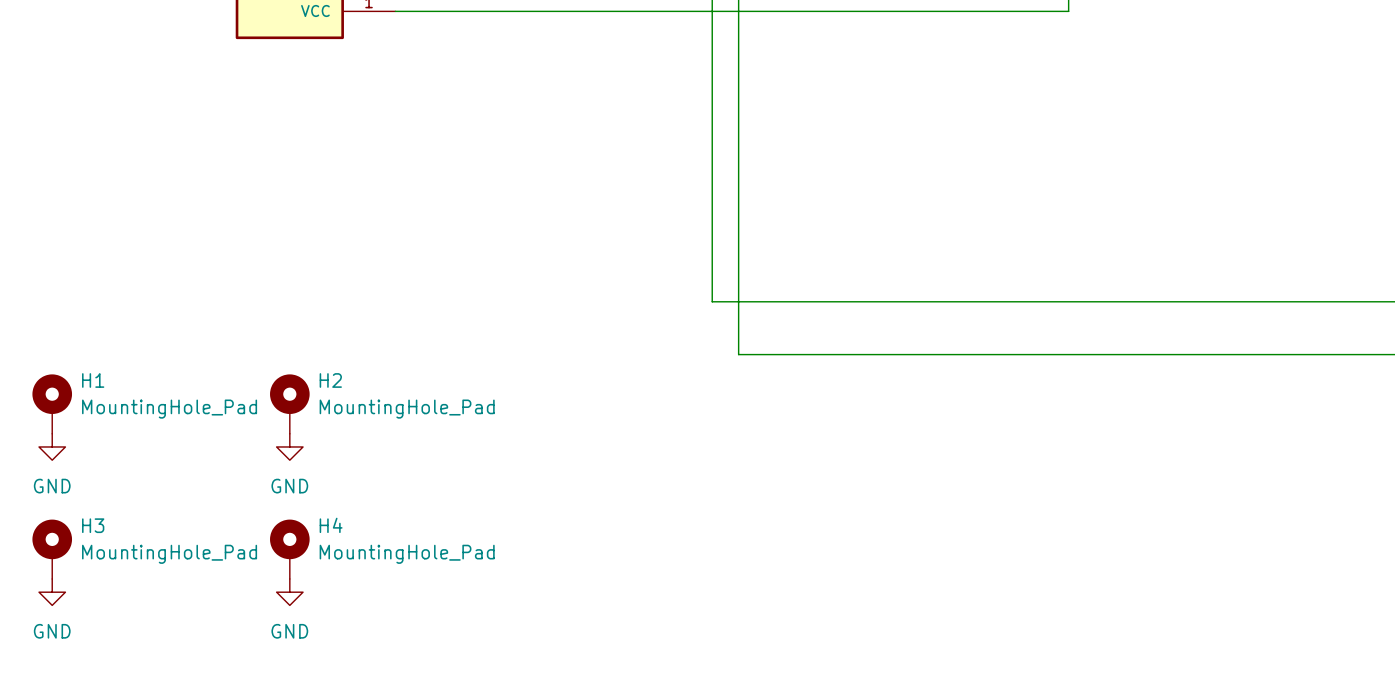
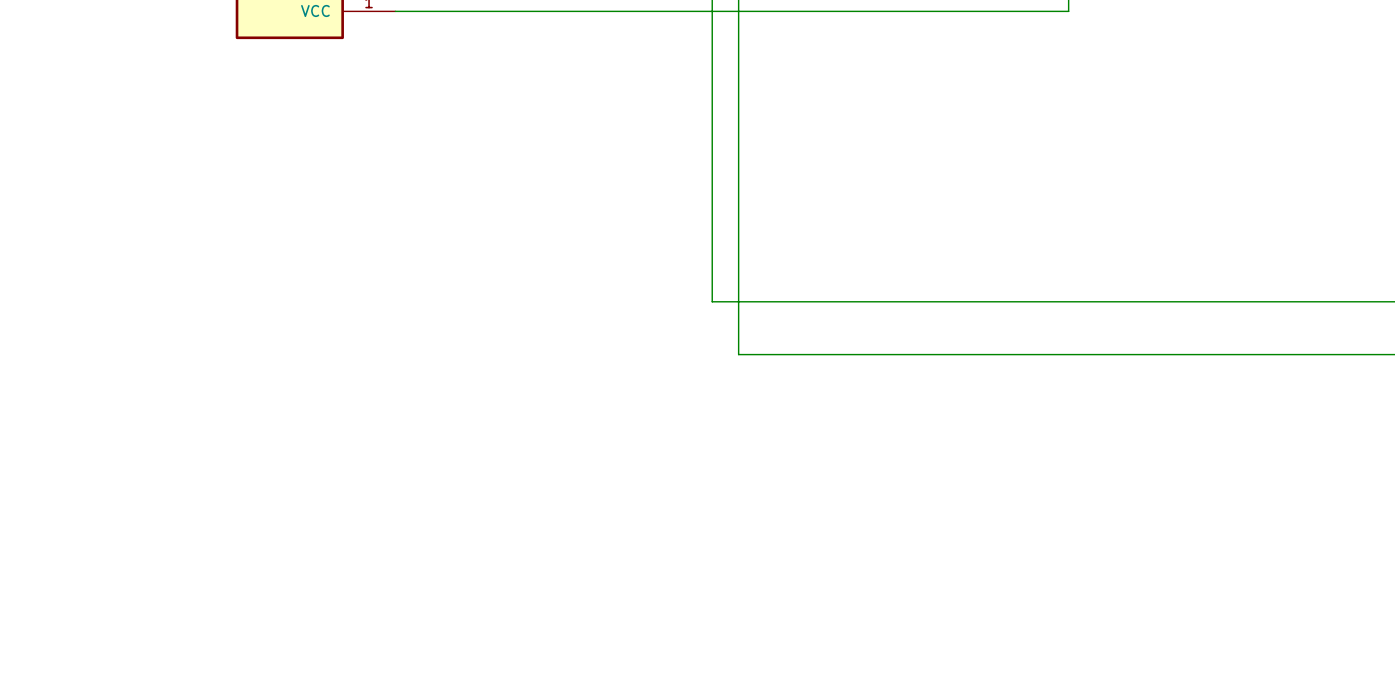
H1: MountingHole_Pad (52, 404) -> none
H2: MountingHole_Pad (289, 404) -> none
power symbol: GND (52, 446) -> none
power symbol: GND (289, 446) -> none
H3: MountingHole_Pad (52, 549) -> none
H4: MountingHole_Pad (289, 549) -> none
power symbol: GND (52, 592) -> none
power symbol: GND (289, 592) -> none

